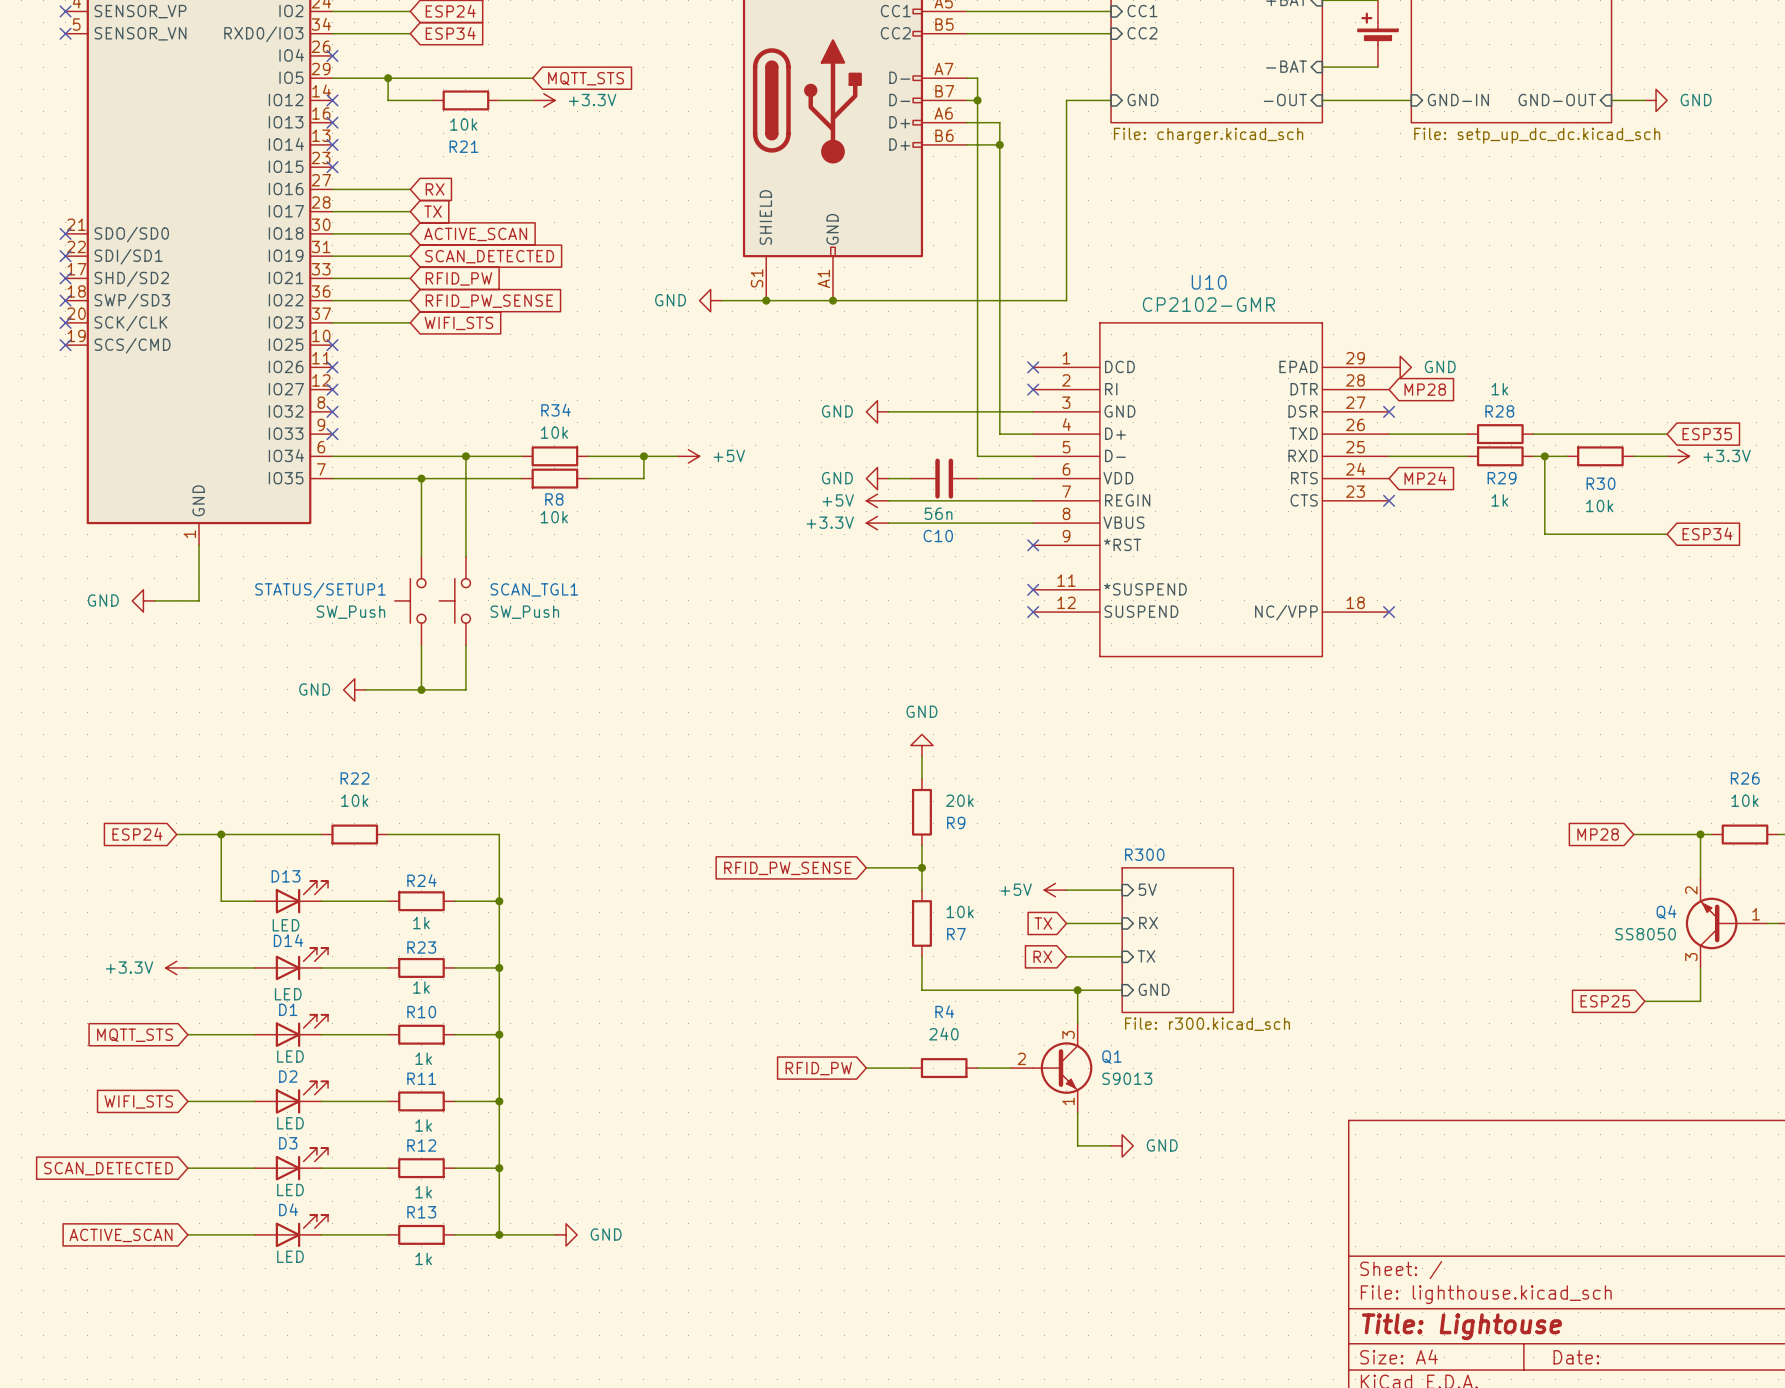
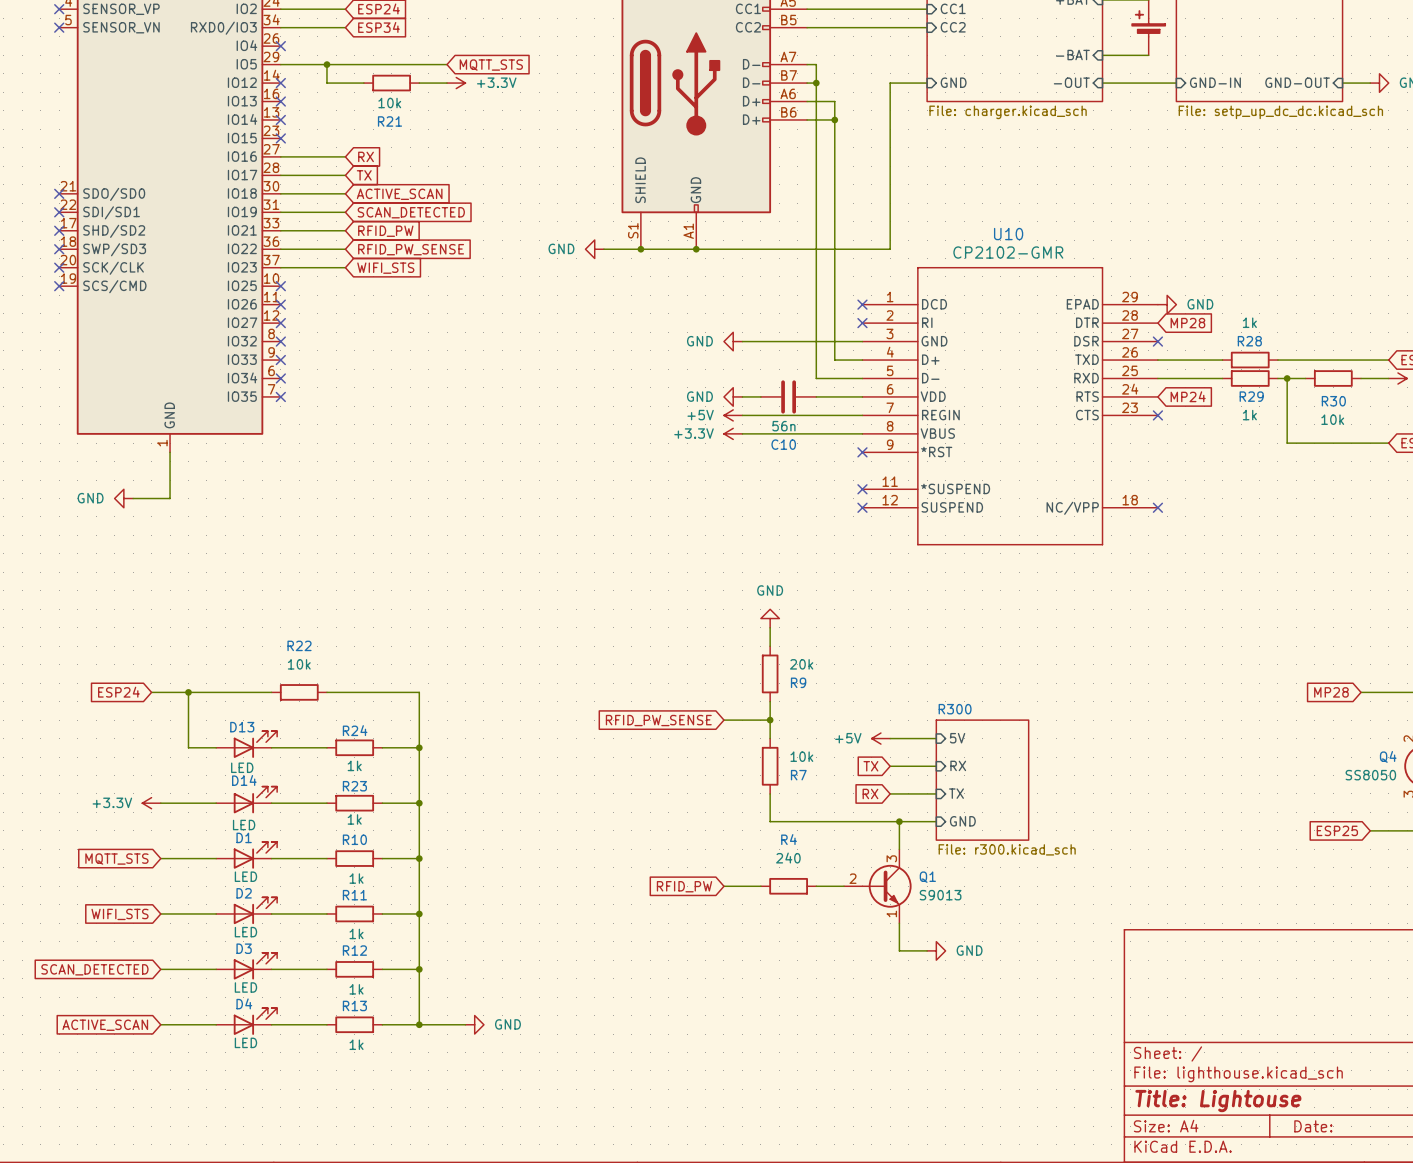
wire: (332, 456) (521, 456) -> none
no-connect mark: none -> (280, 378)
wire: (465, 456) (465, 556) -> none
junction: (465, 456) -> none
R34: 10k (554, 456) -> none
wire: (588, 456) (677, 456) -> none
wire: (643, 456) (643, 478) (588, 478) -> none
junction: (643, 456) -> none
power symbol: +5V (688, 456) -> none
wire: (332, 478) (521, 478) -> none
no-connect mark: none -> (280, 396)
wire: (421, 478) (421, 556) -> none
junction: (421, 478) -> none
R8: 10k (554, 478) -> none
STATUS/SETUP1: SW_Push (410, 600) -> none
SCAN_TGL1: SW_Push (454, 600) -> none
wire: (421, 645) (421, 689) -> none
wire: (465, 645) (465, 689) (365, 689) -> none
power symbol: GND (354, 689) -> none
junction: (421, 689) -> none

